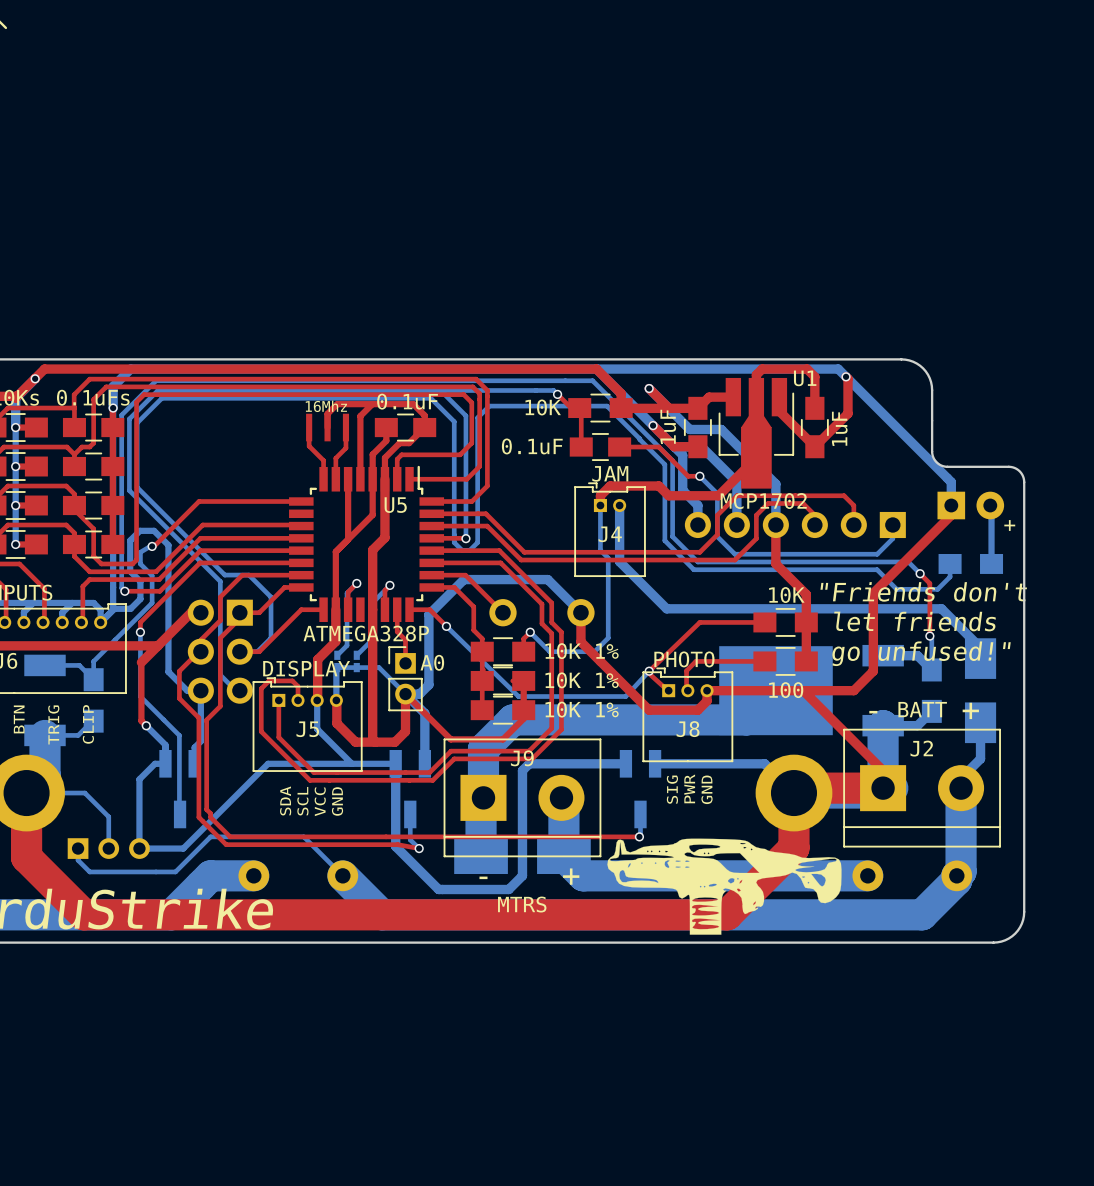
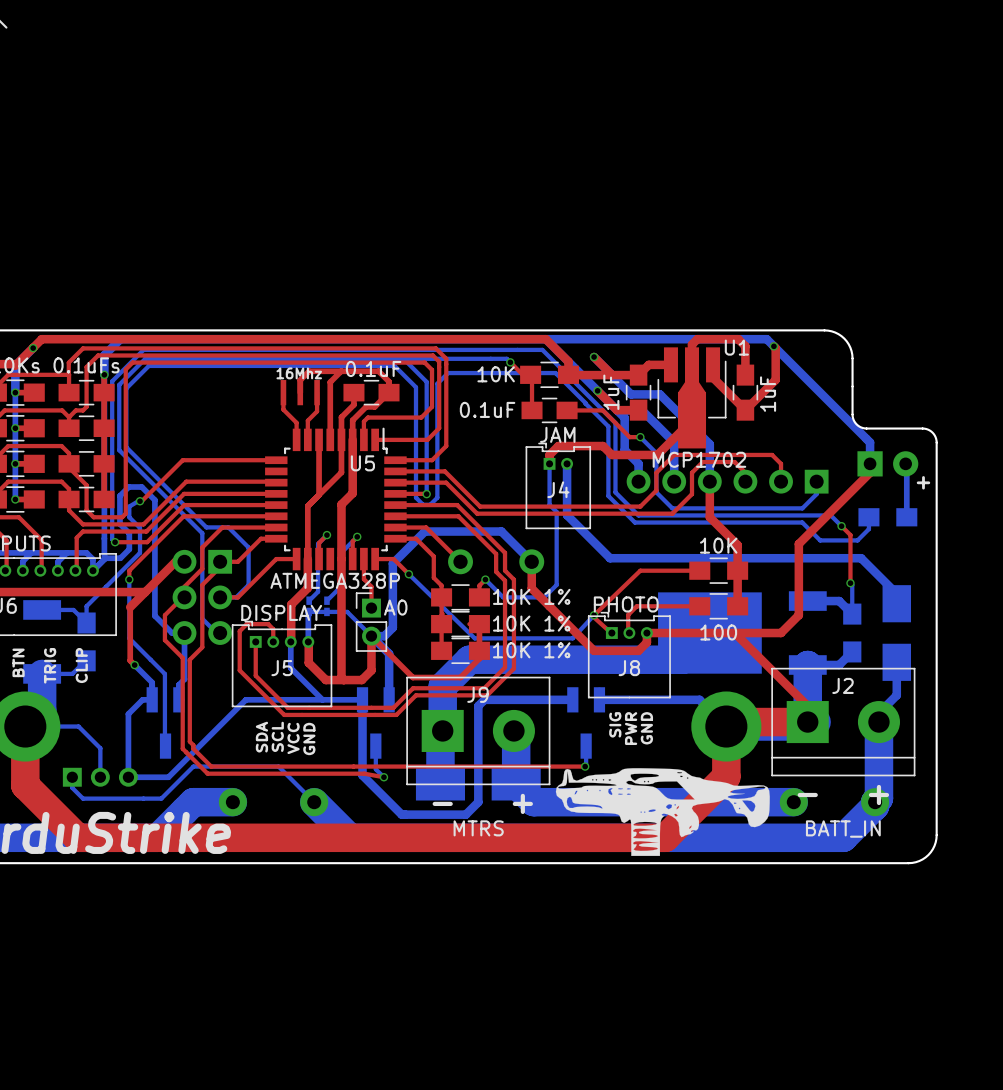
text: "Friends don't (923, 591) -> none
text: let friends (915, 621) -> none
text: go unfused!" (921, 653) -> none
J2 value: BATT (922, 709) -> BATT_IN (843, 829)
text position: + (970, 710) -> + (878, 794)
text position: - (873, 712) -> - (807, 794)

